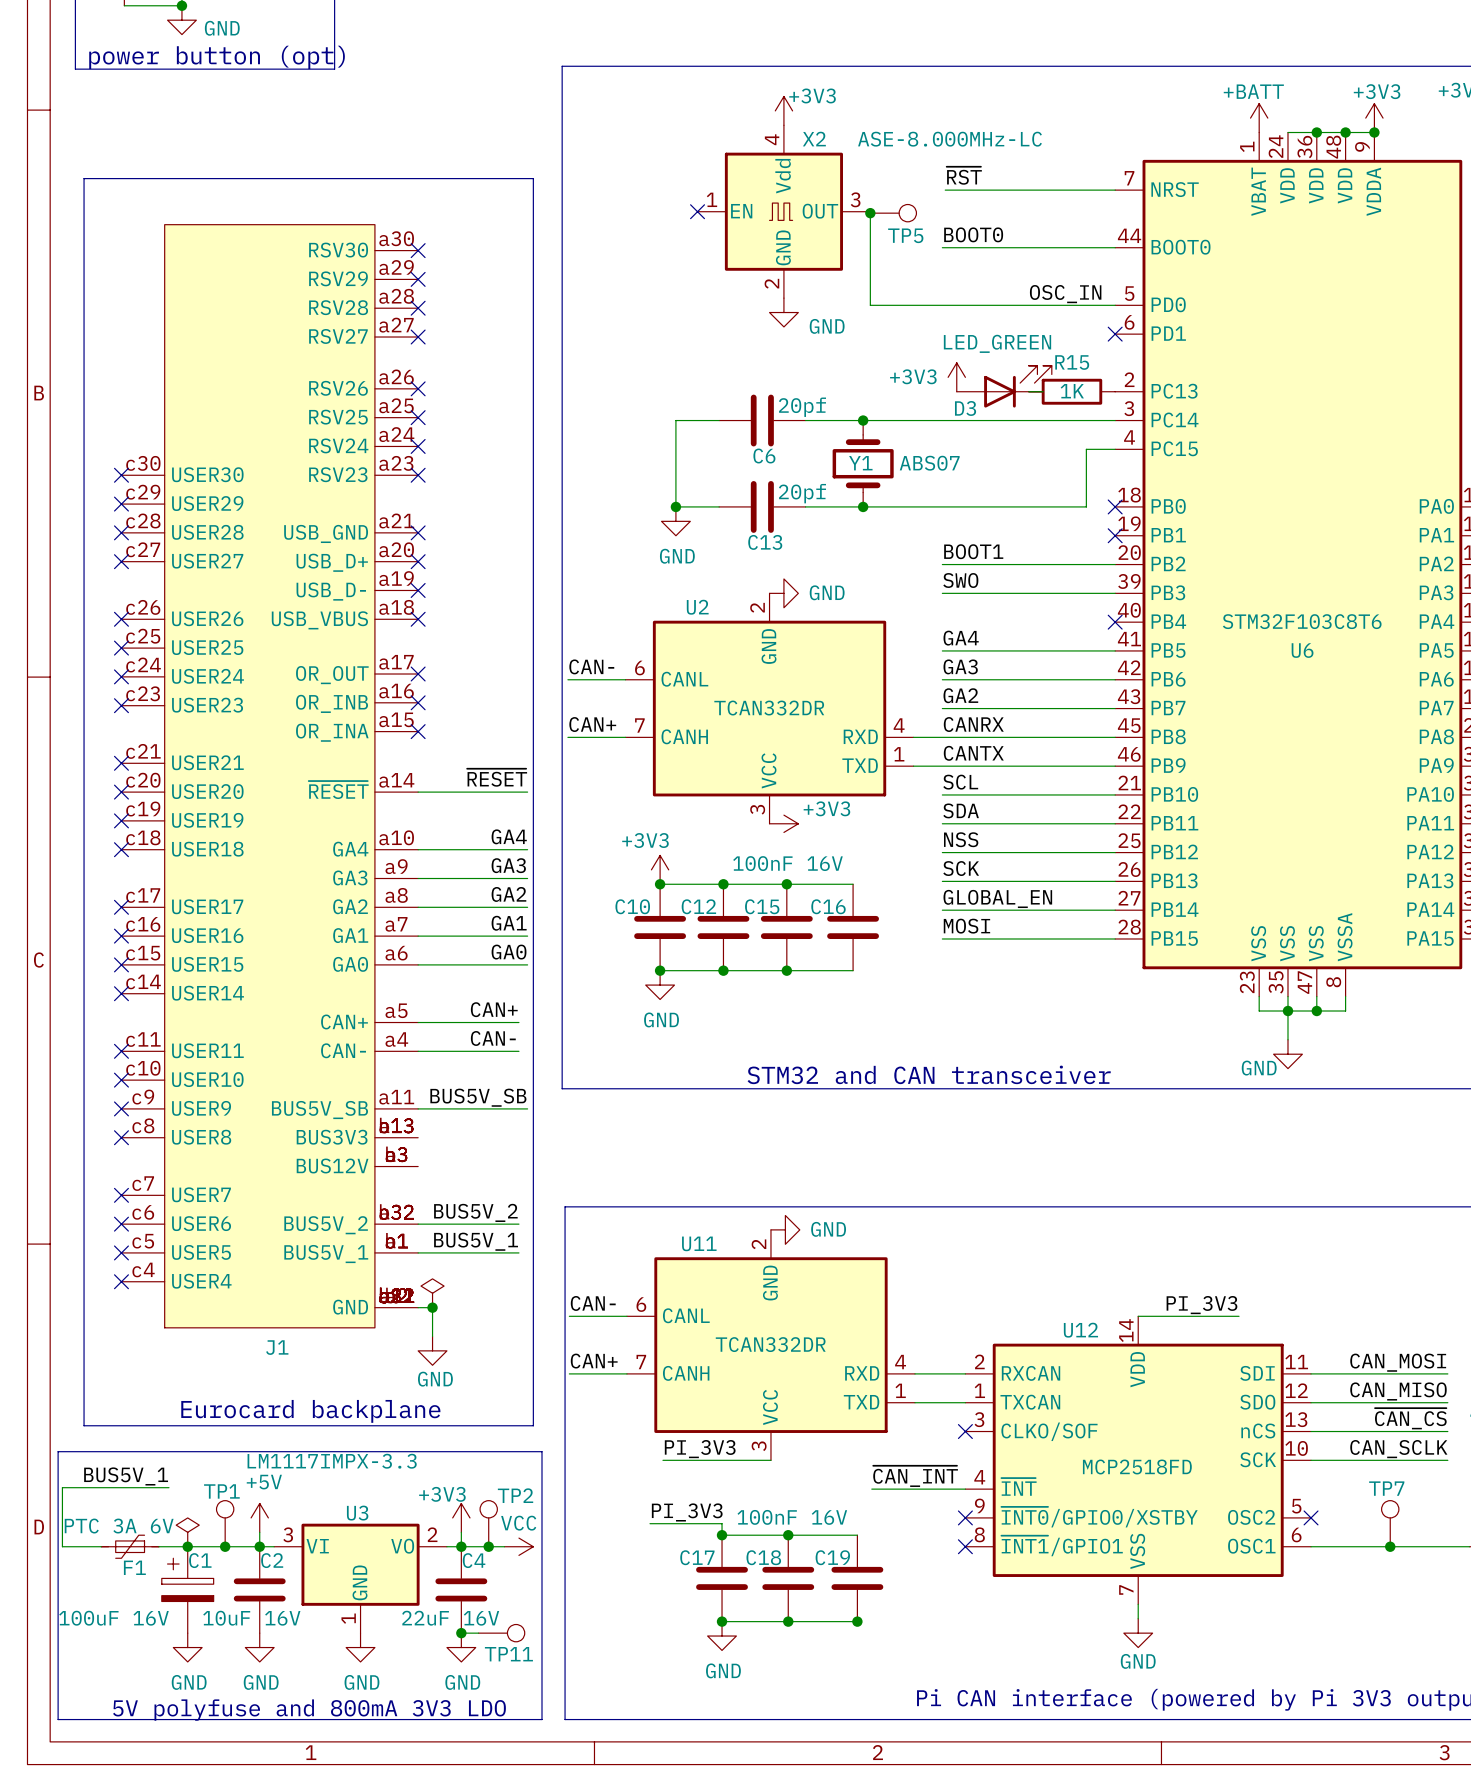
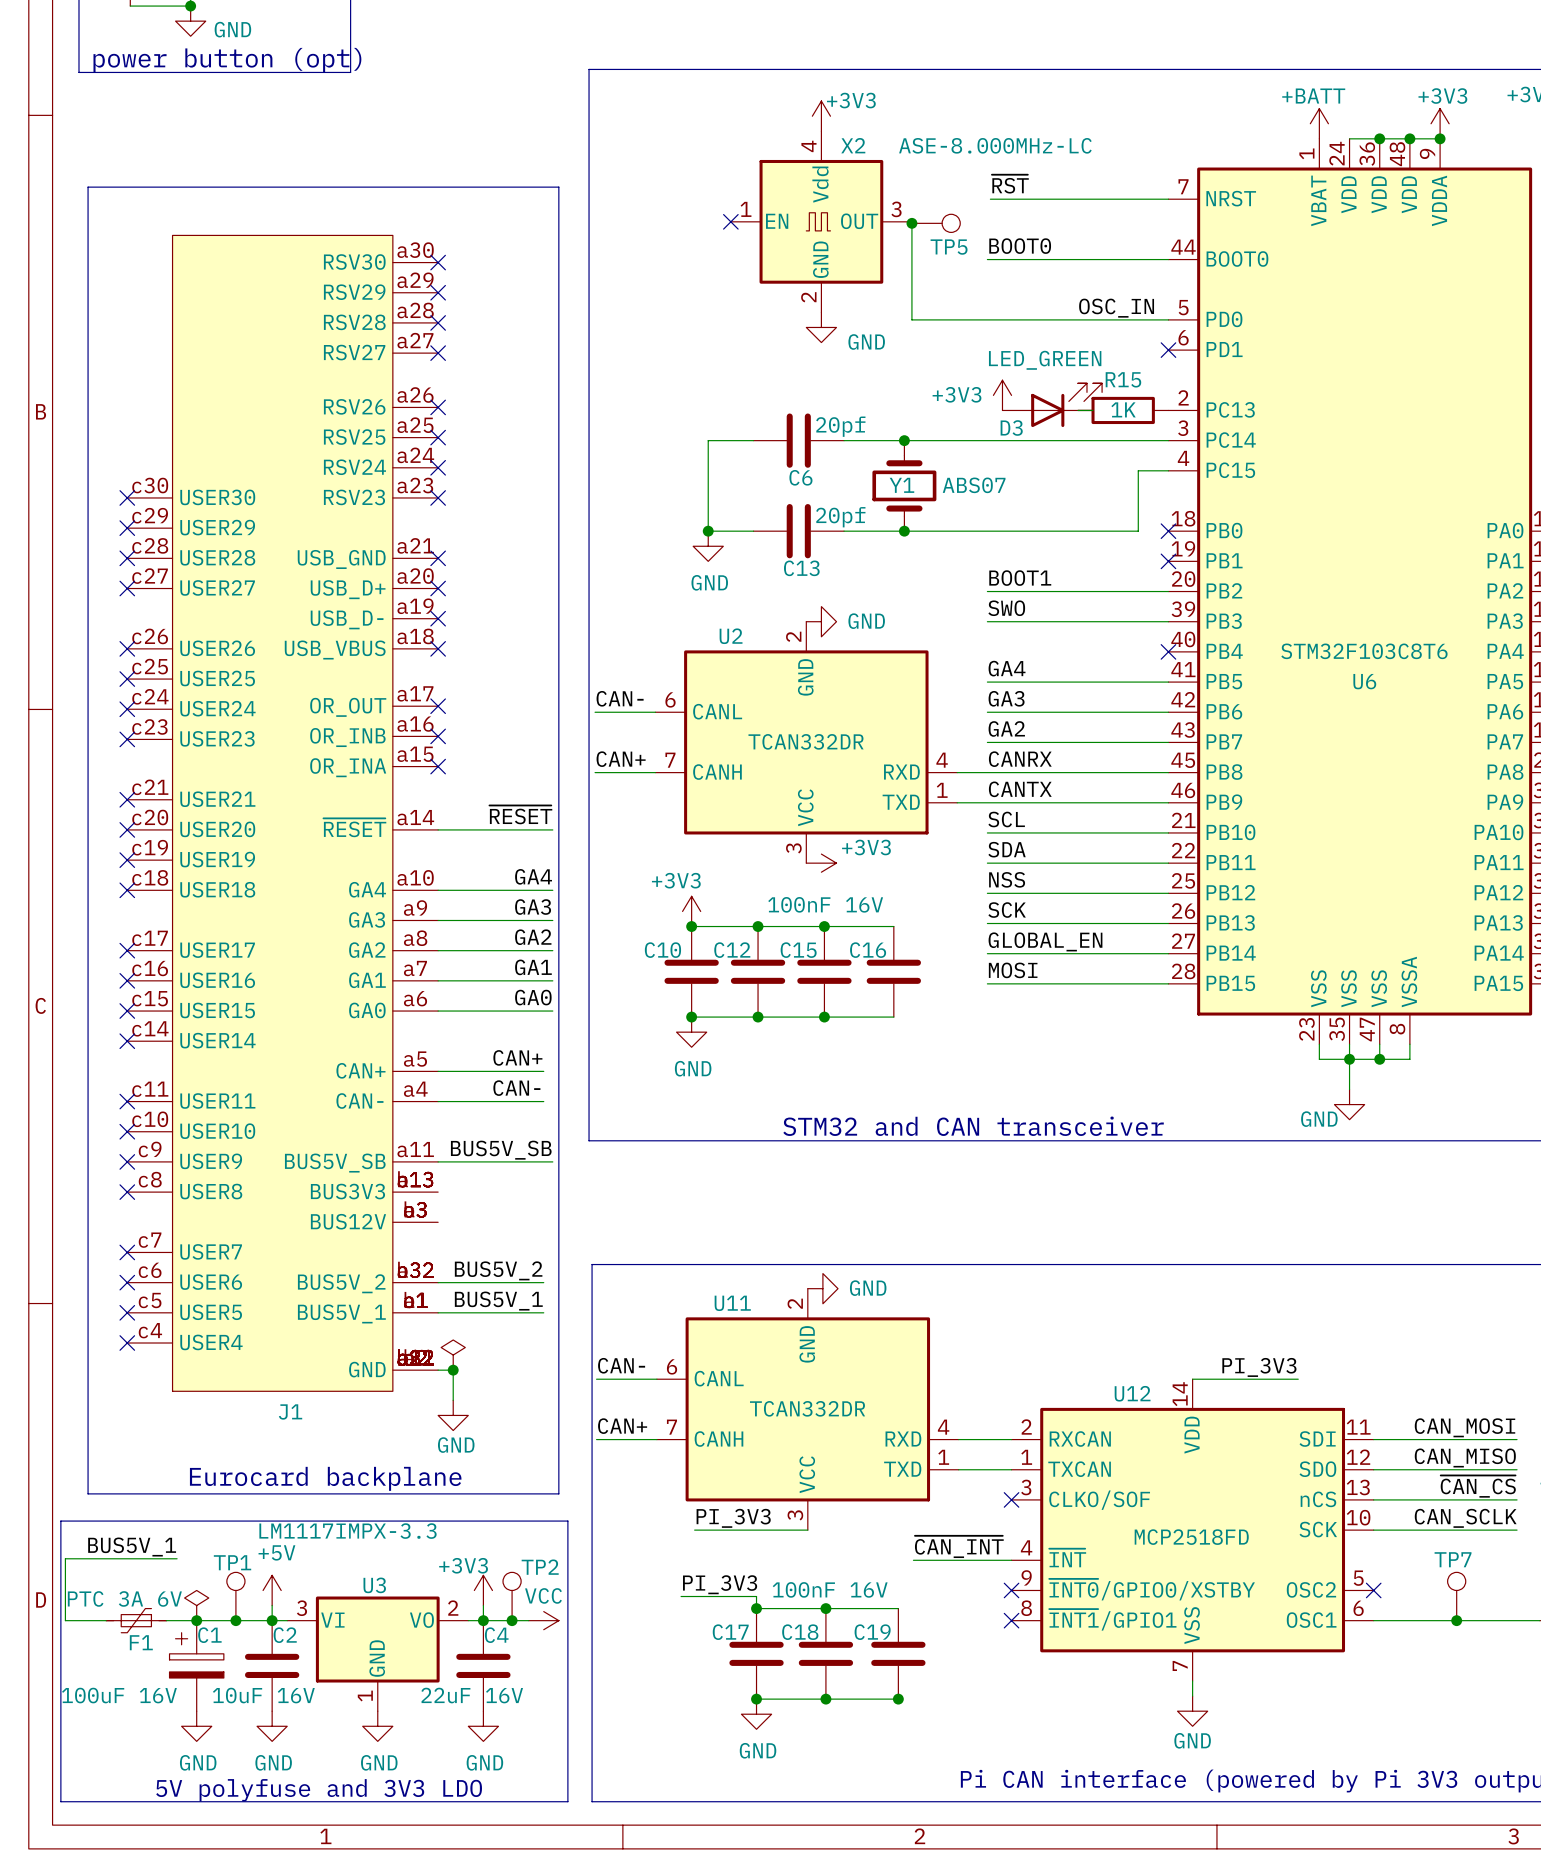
junction: (461, 1633) -> none
wire: (478, 1633) (461, 1633) (461, 1636) -> none
TP11: (501, 1633) -> none
text: 5V polyfuse and 800mA 3V3 LDO (309, 1710) -> 5V polyfuse and 3V3 LDO (319, 1790)

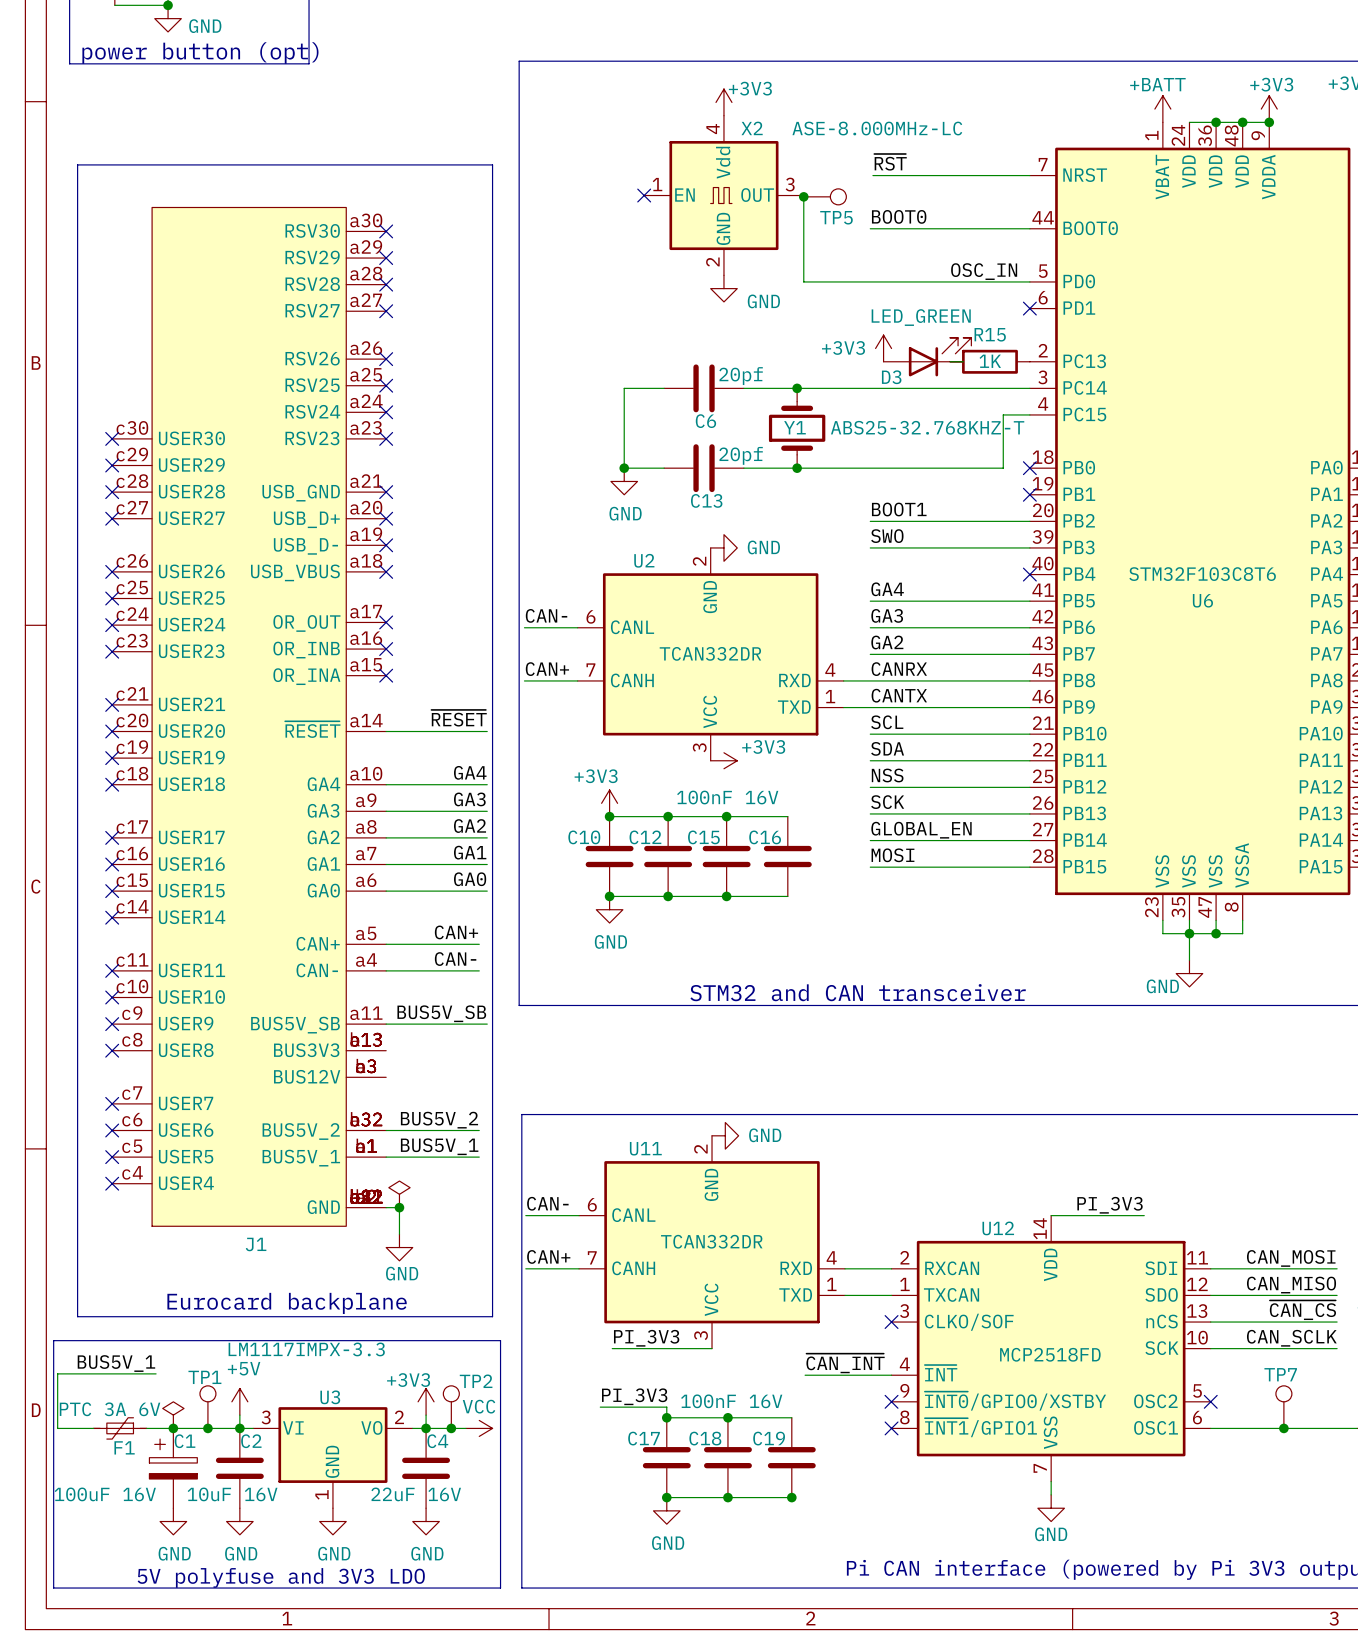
Y1 value: ABS07 (974, 485) -> ABS25-32.768KHZ-T (927, 427)

